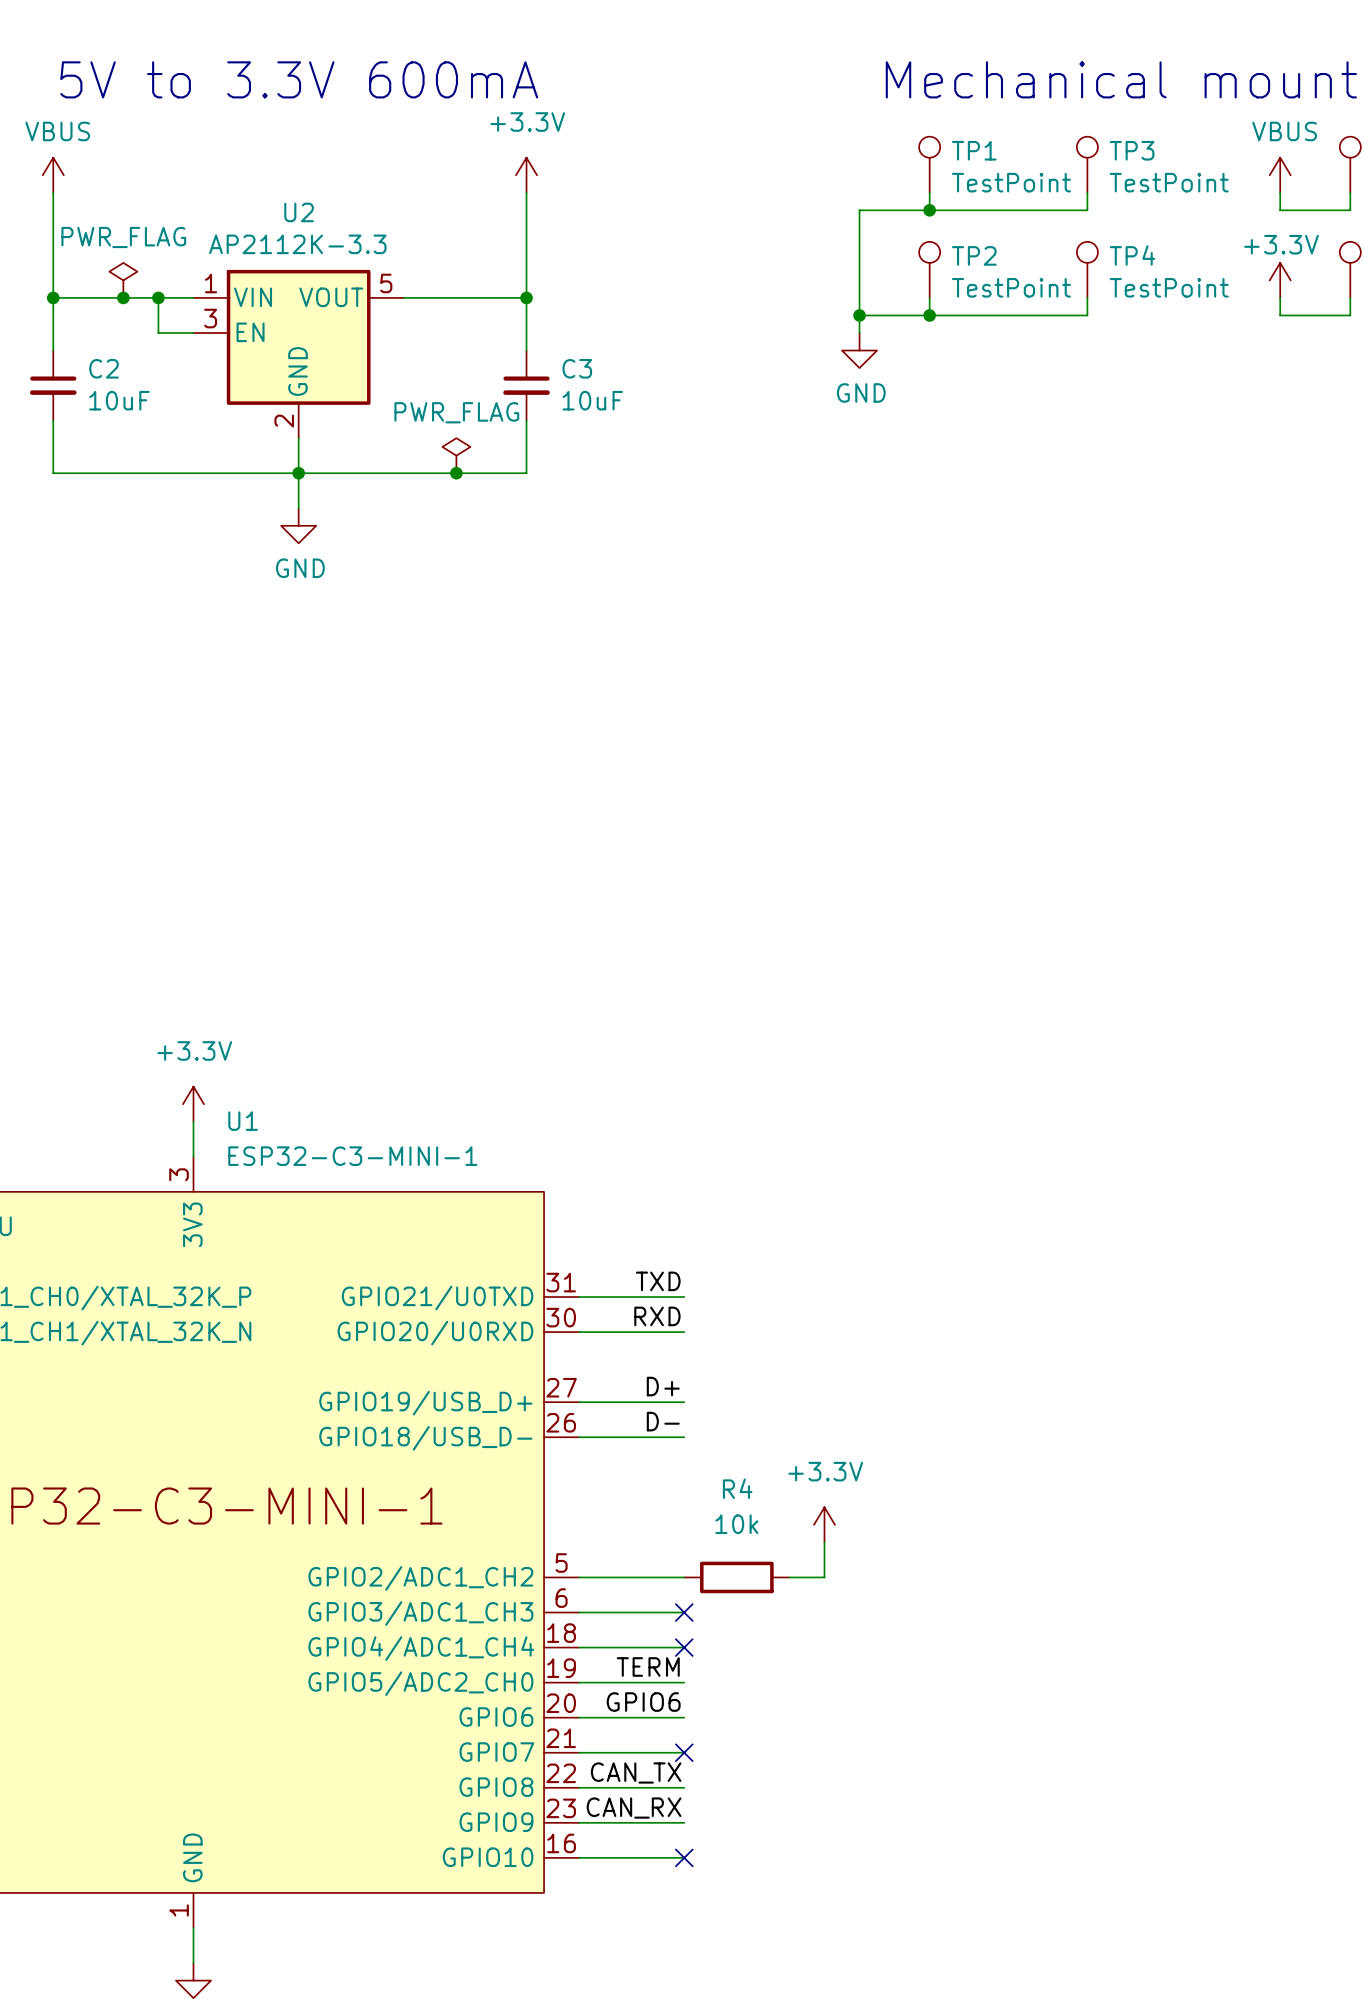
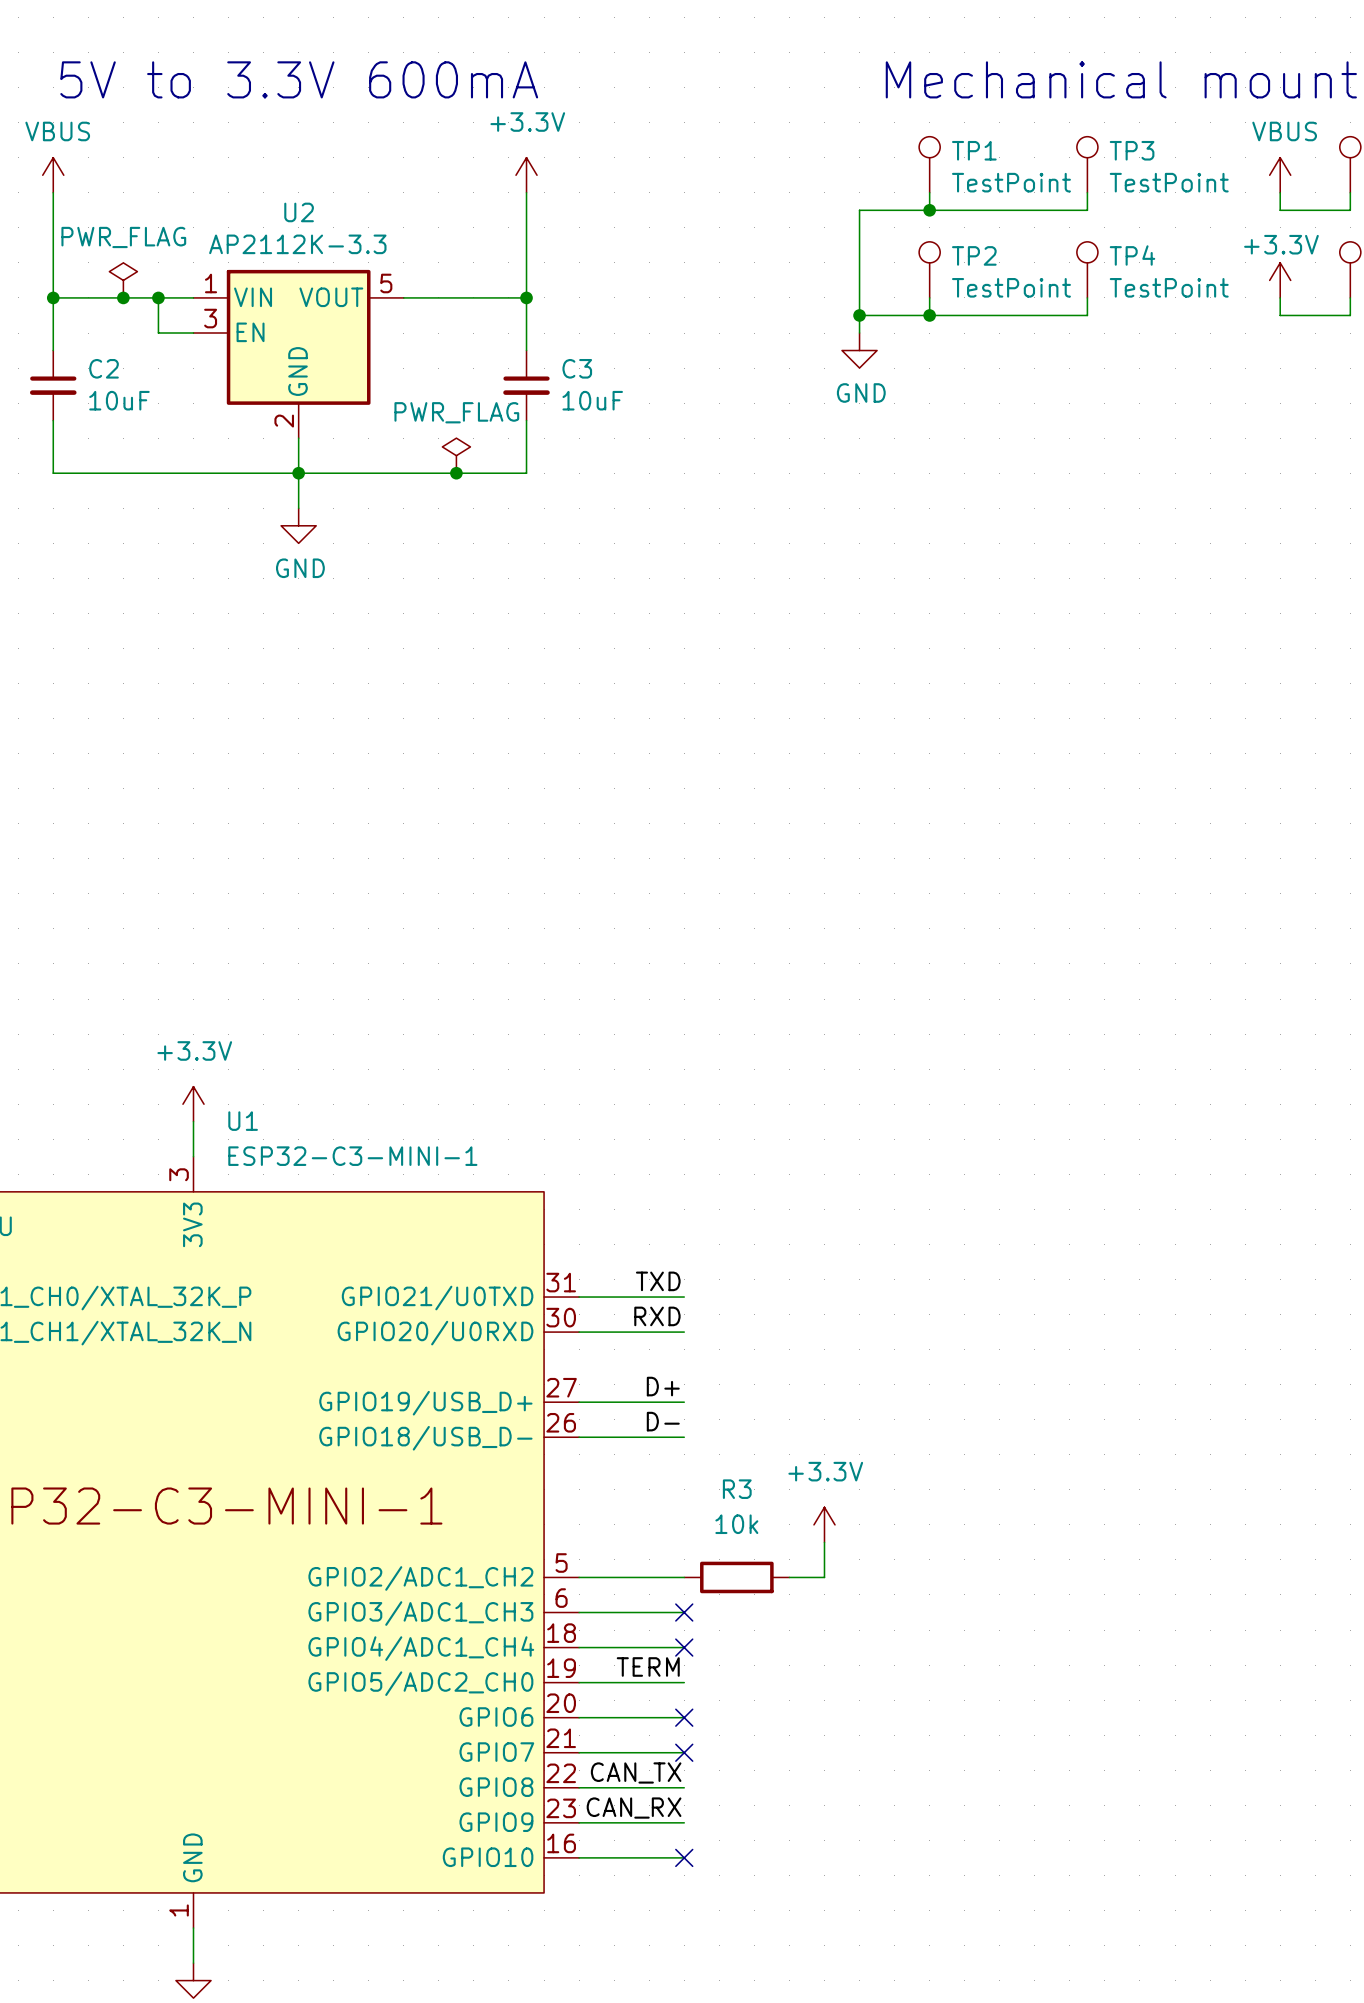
R4 name: R4 (737, 1488) -> R3 (737, 1489)
label: GPIO6 (643, 1702) -> none
no-connect mark: none -> (684, 1717)

